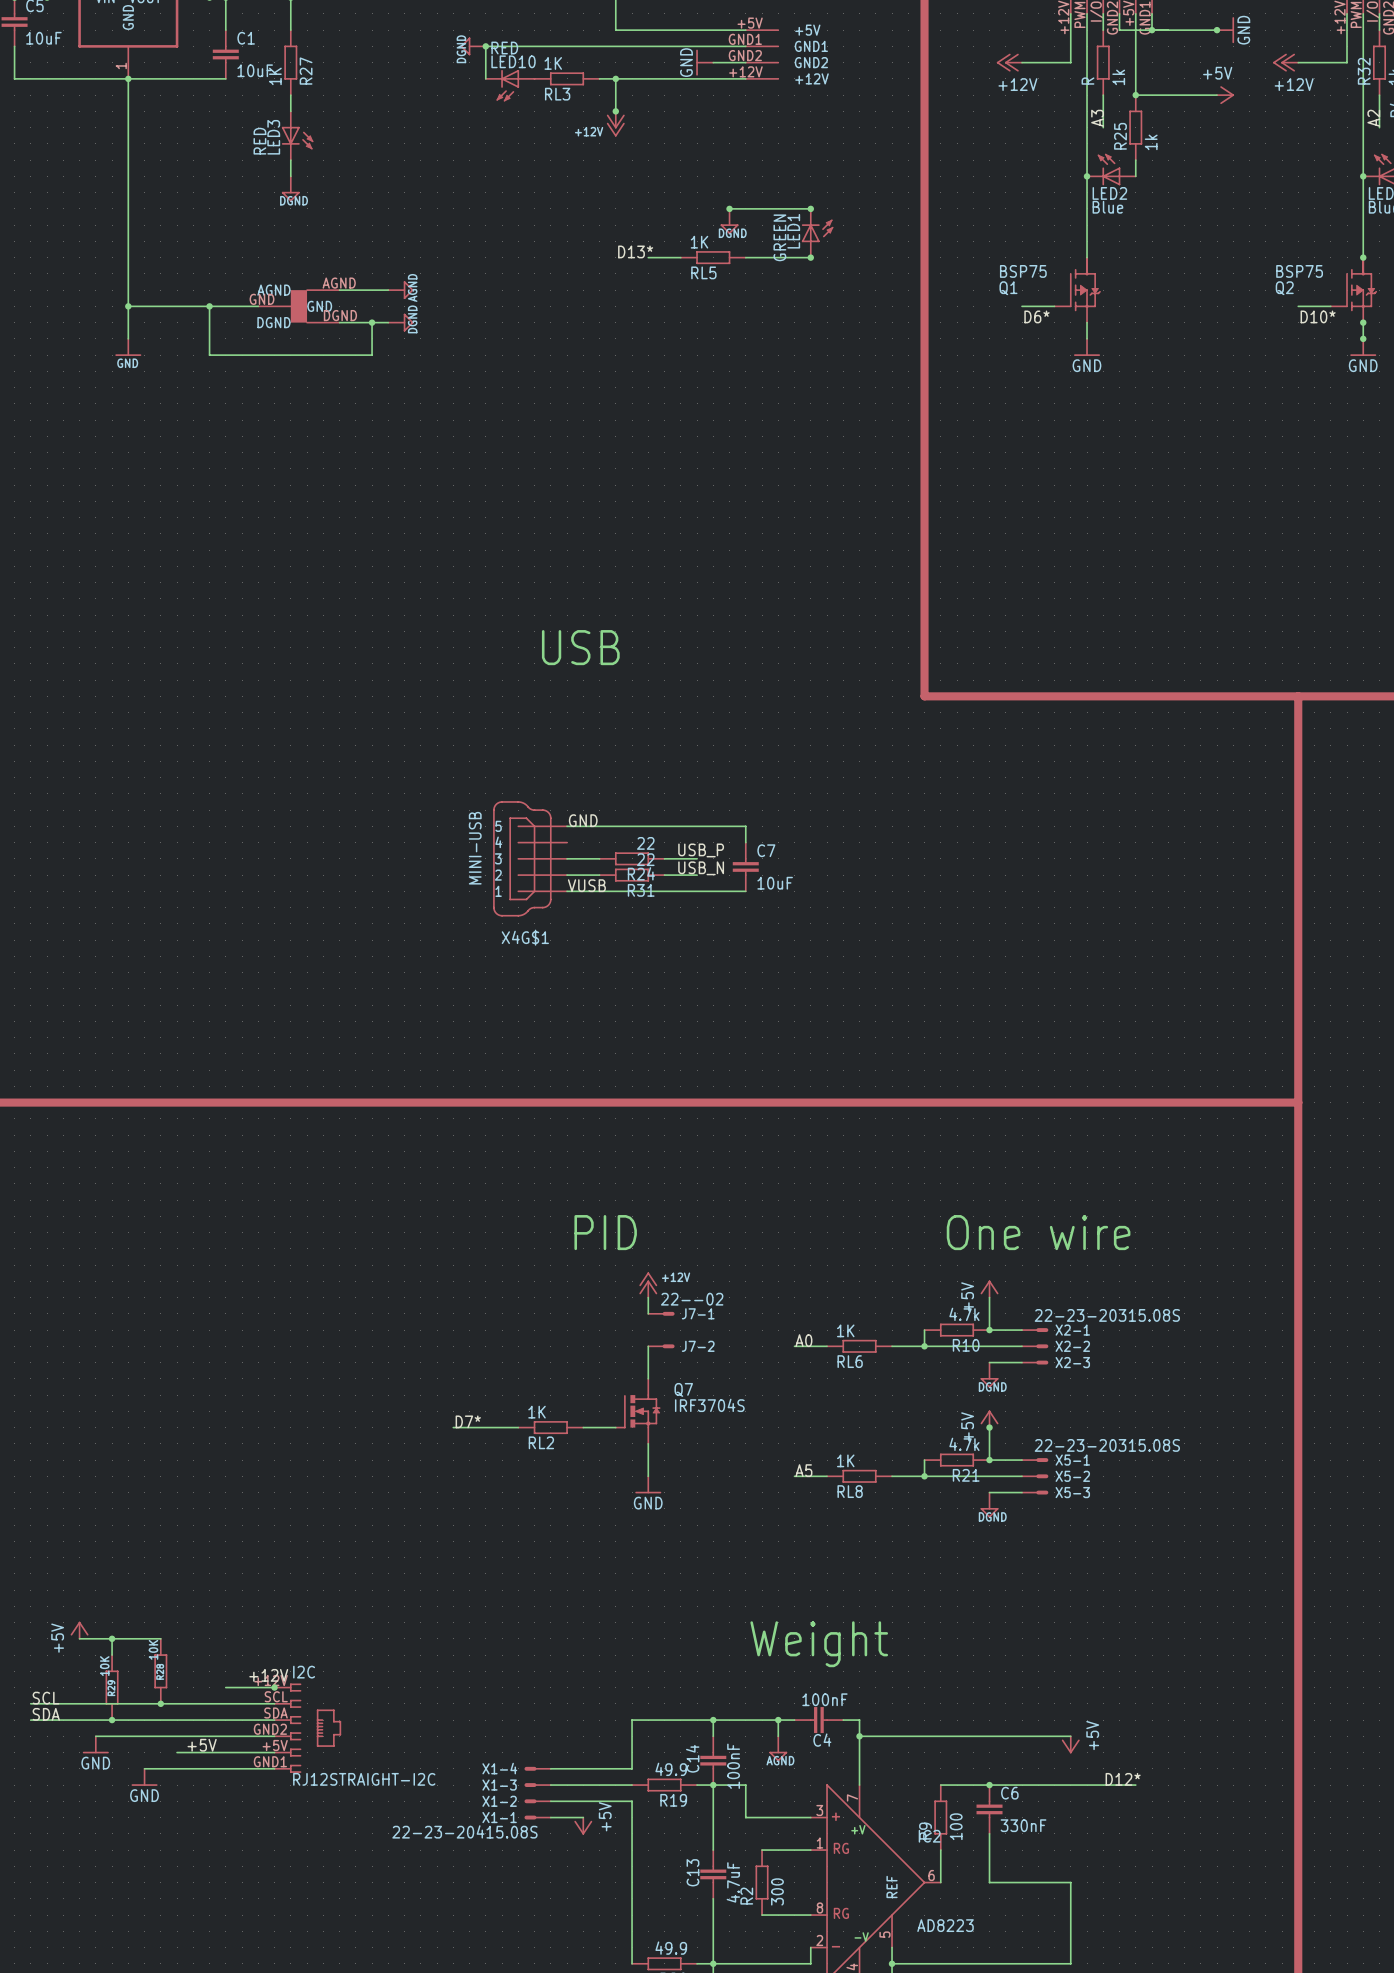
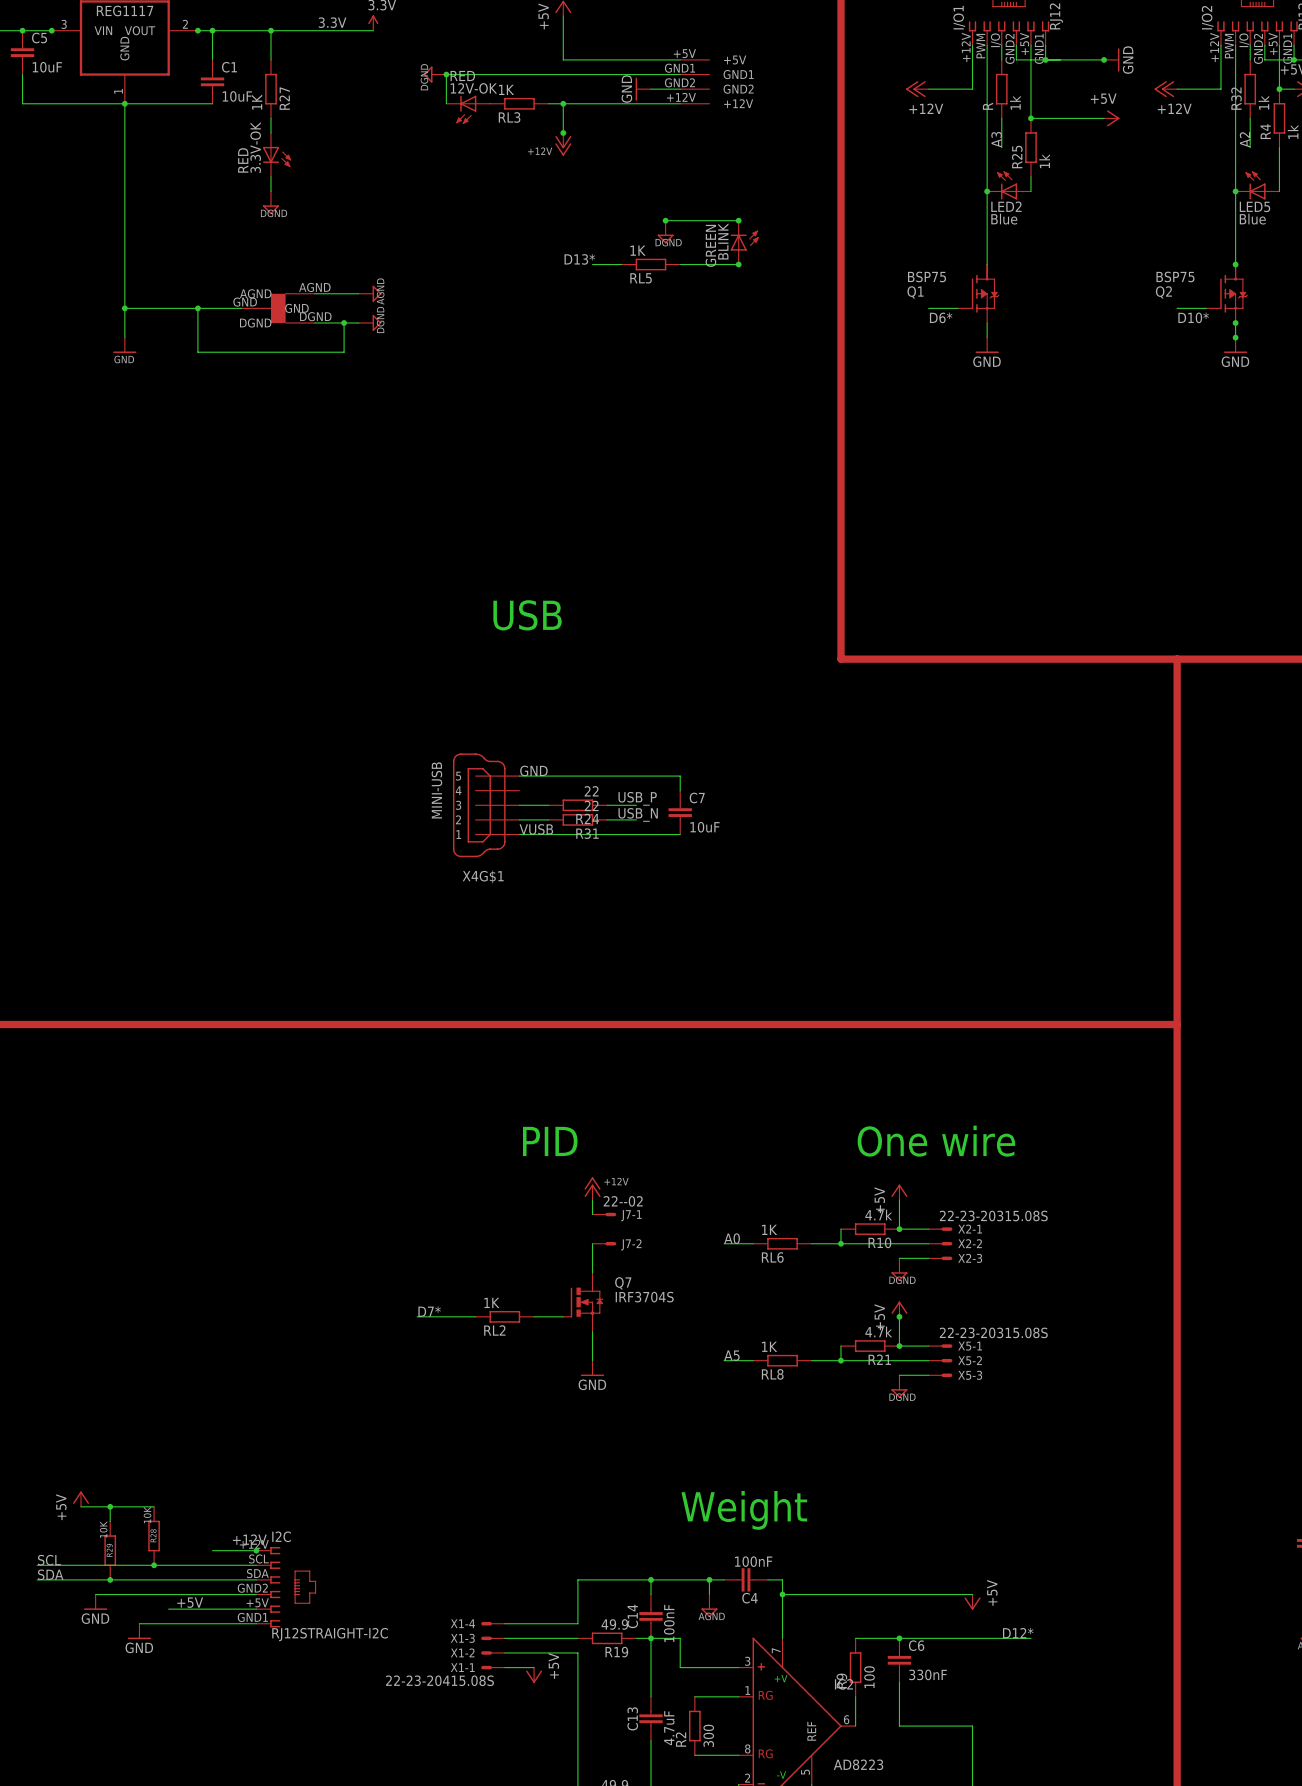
LED10 name: LED10 (513, 61) -> 12V-OK (473, 88)
LED3 name: LED3 (273, 137) -> 3.3V-OK (255, 147)
LED1 name: LED1 (793, 231) -> BLINK (723, 241)

